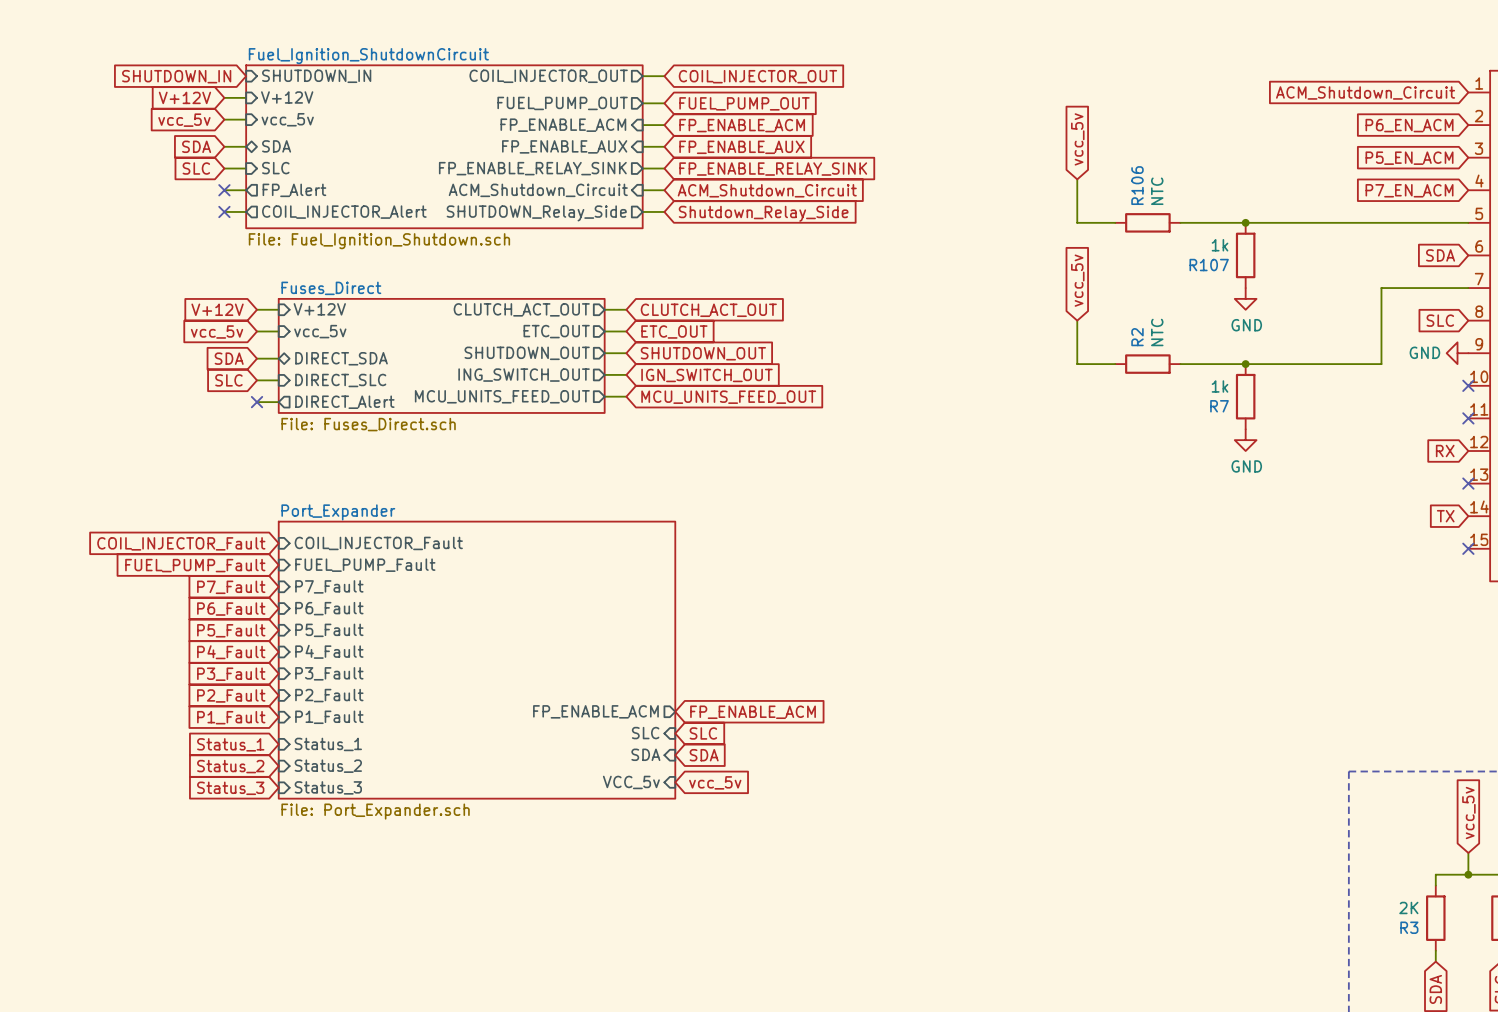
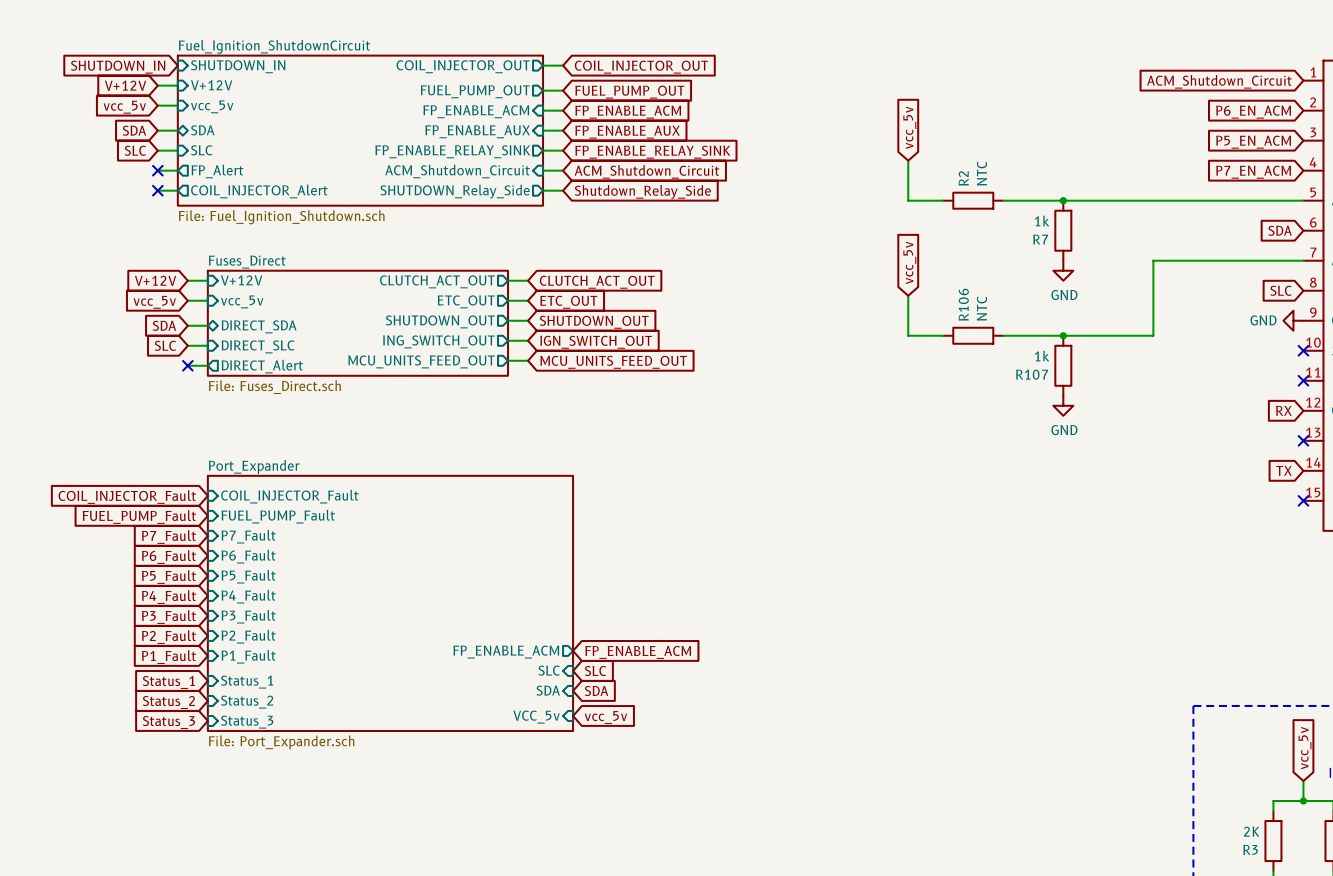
global label position: vcc_5v (1077, 139) -> vcc_5v (909, 127)
wire: (1077, 179) (1077, 222) (1115, 222) -> (908, 160) (908, 200) (943, 200)
wire: none -> (1003, 200) (1038, 200)
R106 position: (1147, 222) -> (973, 335)
junction position: (1245, 222) -> (1063, 200)
R107 position: (1245, 255) -> (1063, 365)
global label position: vcc_5v (1077, 280) -> vcc_5v (909, 262)
wire: (1381, 288) (1381, 364) (1180, 364) -> (1223, 260) (1153, 260) (1153, 335) (1003, 335)
power symbol position: GND (1245, 298) -> GND (1063, 270)
wire: (1077, 320) (1077, 364) (1115, 364) -> (908, 295) (908, 335) (943, 335)
R2 position: (1147, 364) -> (973, 200)
junction position: (1245, 364) -> (1063, 335)
R7 position: (1245, 396) -> (1063, 230)
power symbol position: GND (1245, 440) -> GND (1063, 405)

